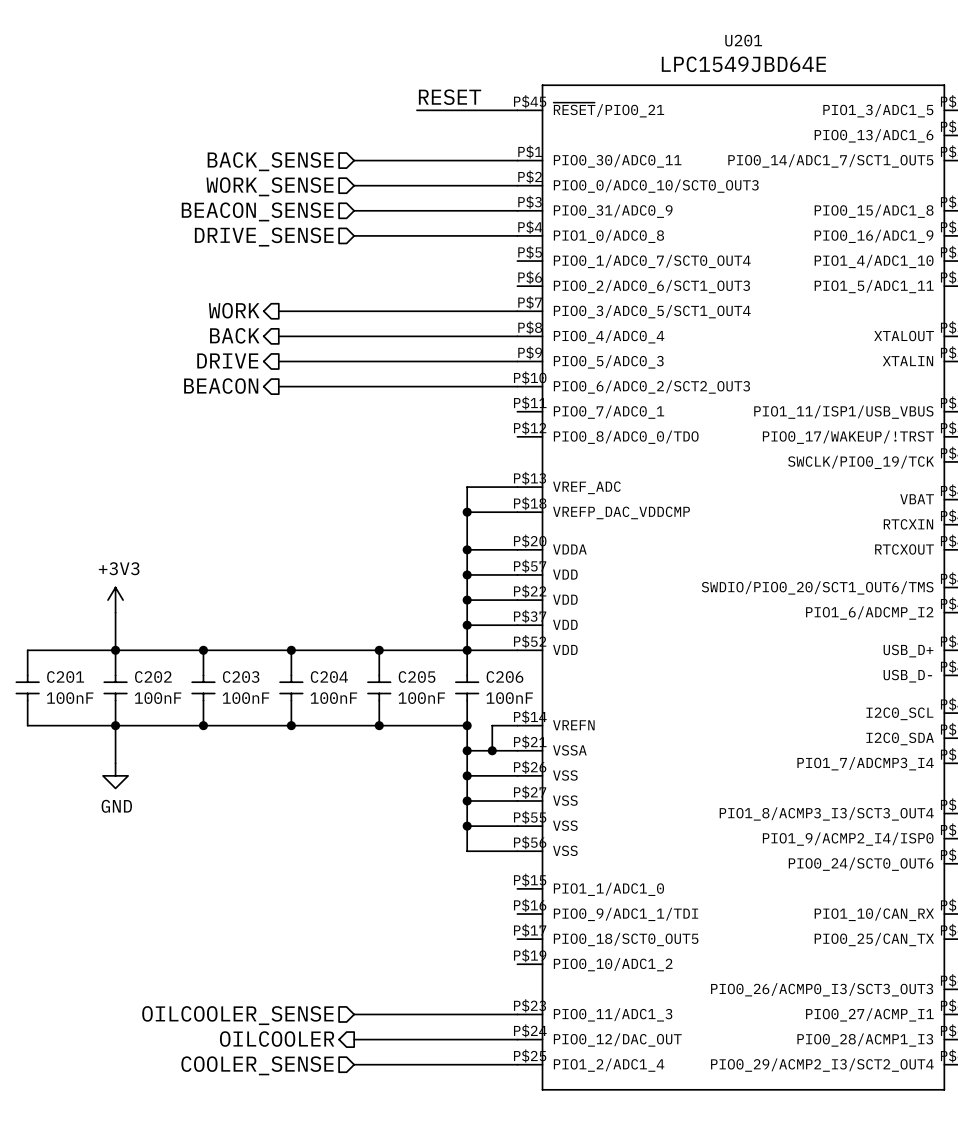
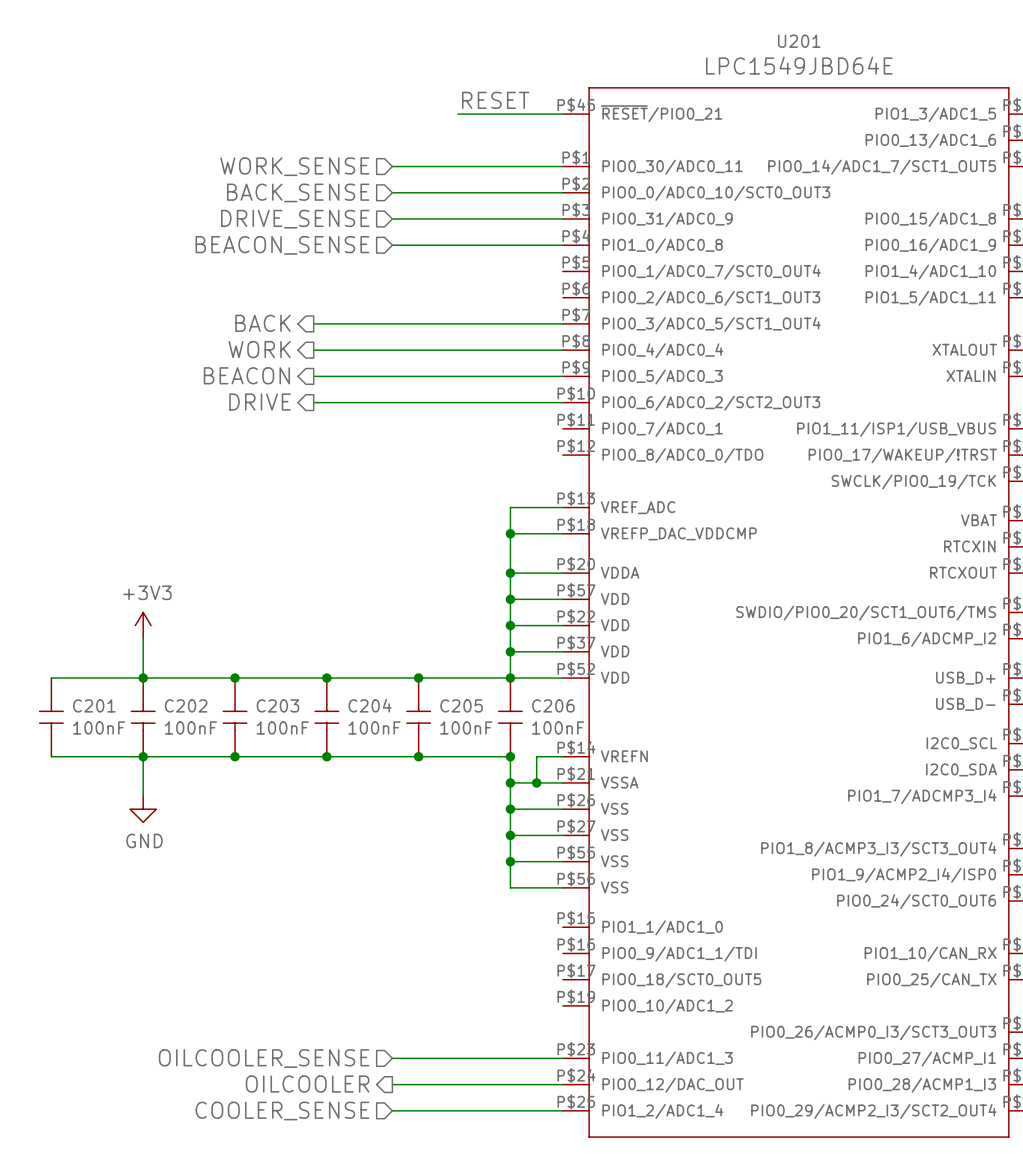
hierarchical label: BACK_SENSE (270, 161) -> WORK_SENSE (294, 166)
hierarchical label: WORK_SENSE (270, 186) -> BACK_SENSE (298, 192)
hierarchical label: BEACON_SENSE (257, 211) -> DRIVE_SENSE (295, 219)
hierarchical label: DRIVE_SENSE (264, 237) -> BEACON_SENSE (282, 245)
hierarchical label: WORK (234, 310) -> BACK (263, 323)
hierarchical label: BACK (234, 335) -> WORK (259, 349)
hierarchical label: DRIVE (227, 360) -> BEACON (246, 375)
hierarchical label: BEACON (221, 386) -> DRIVE (260, 402)

